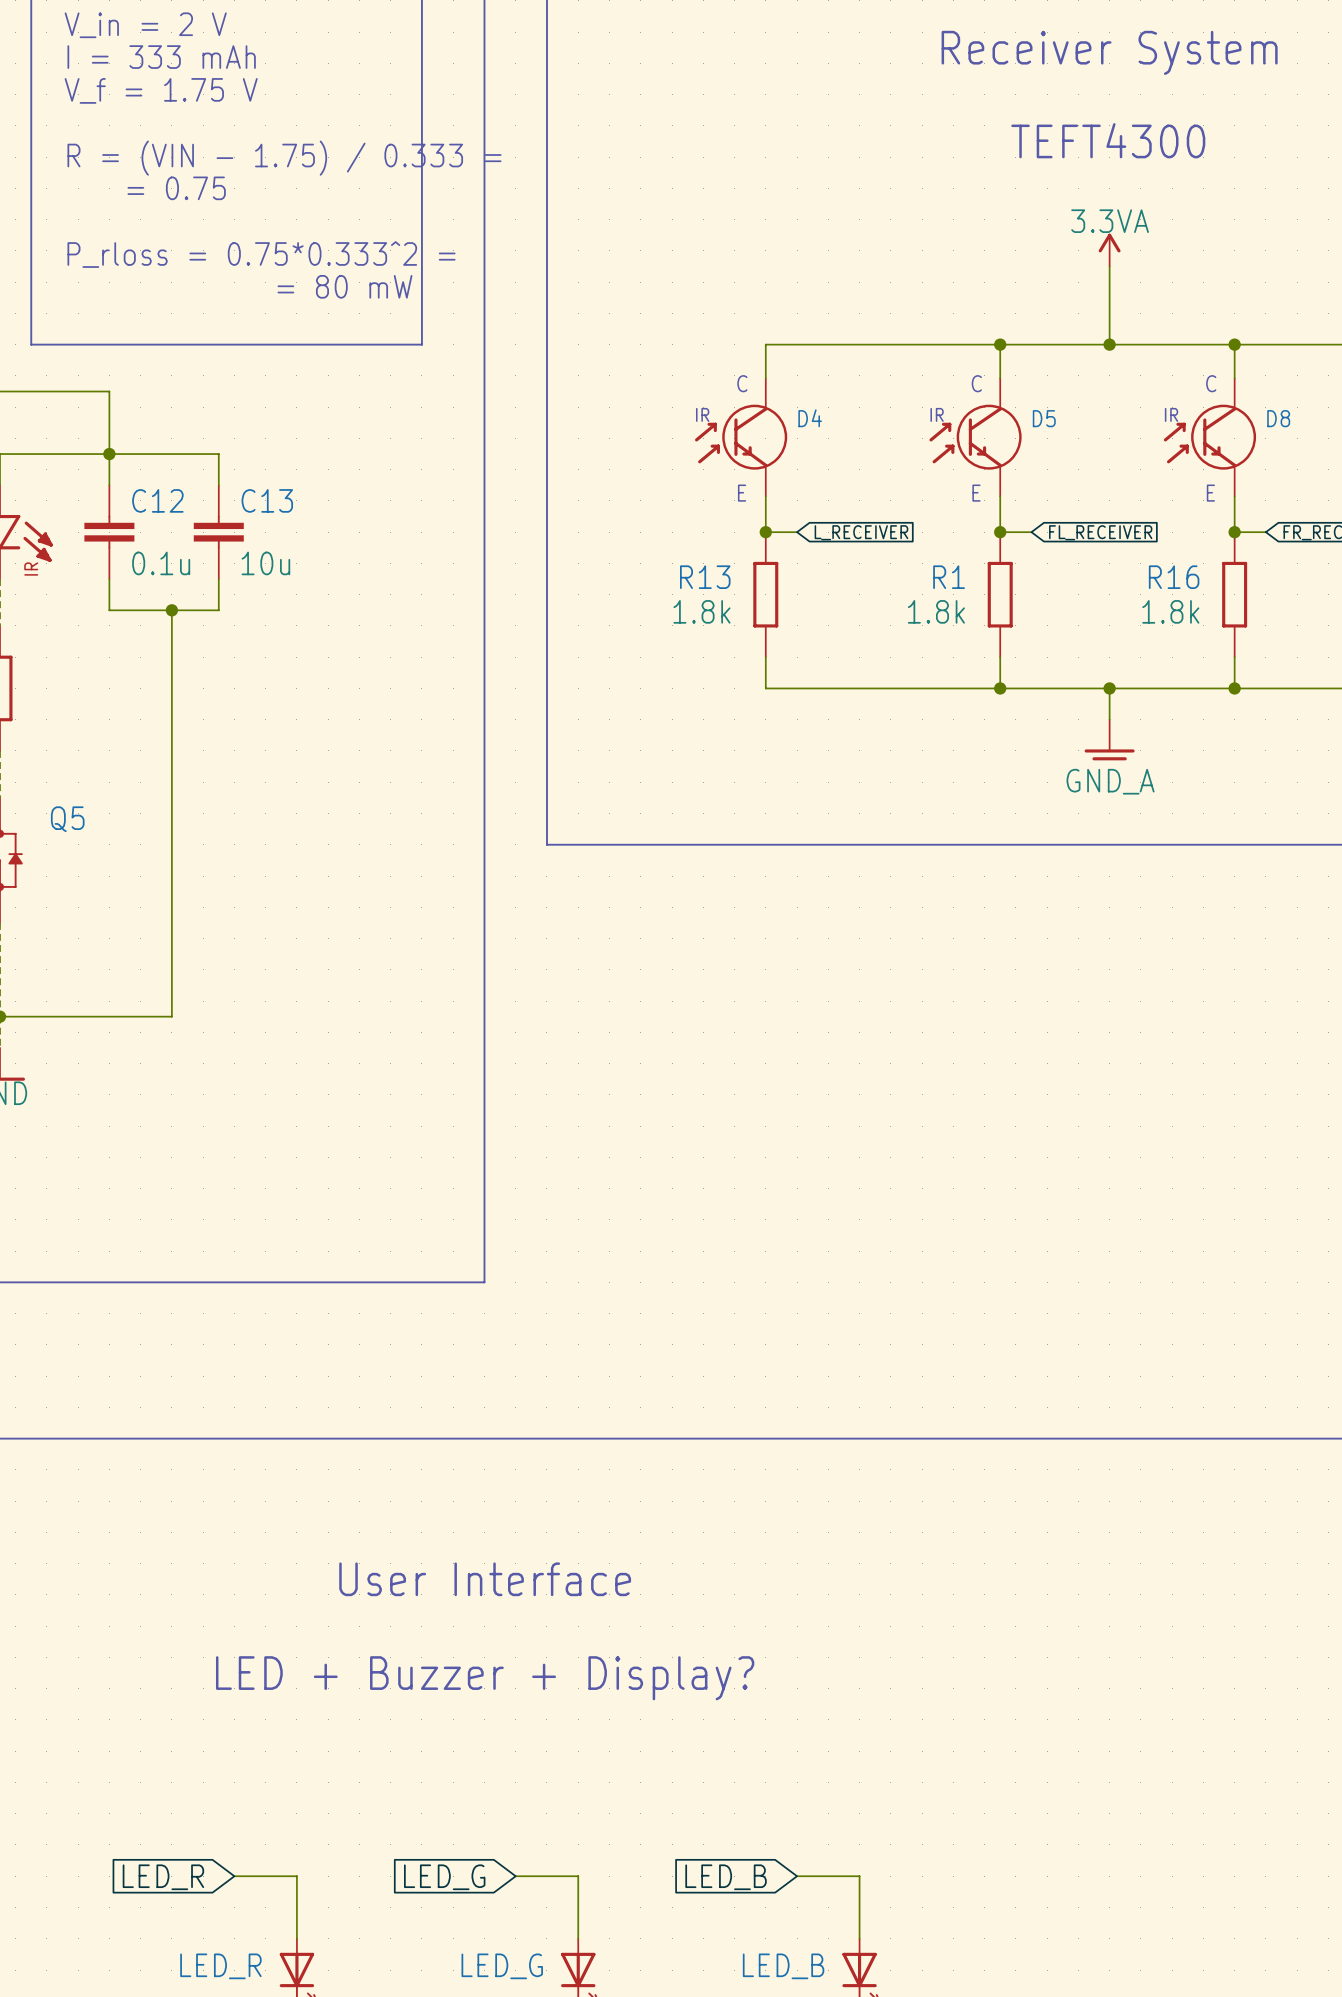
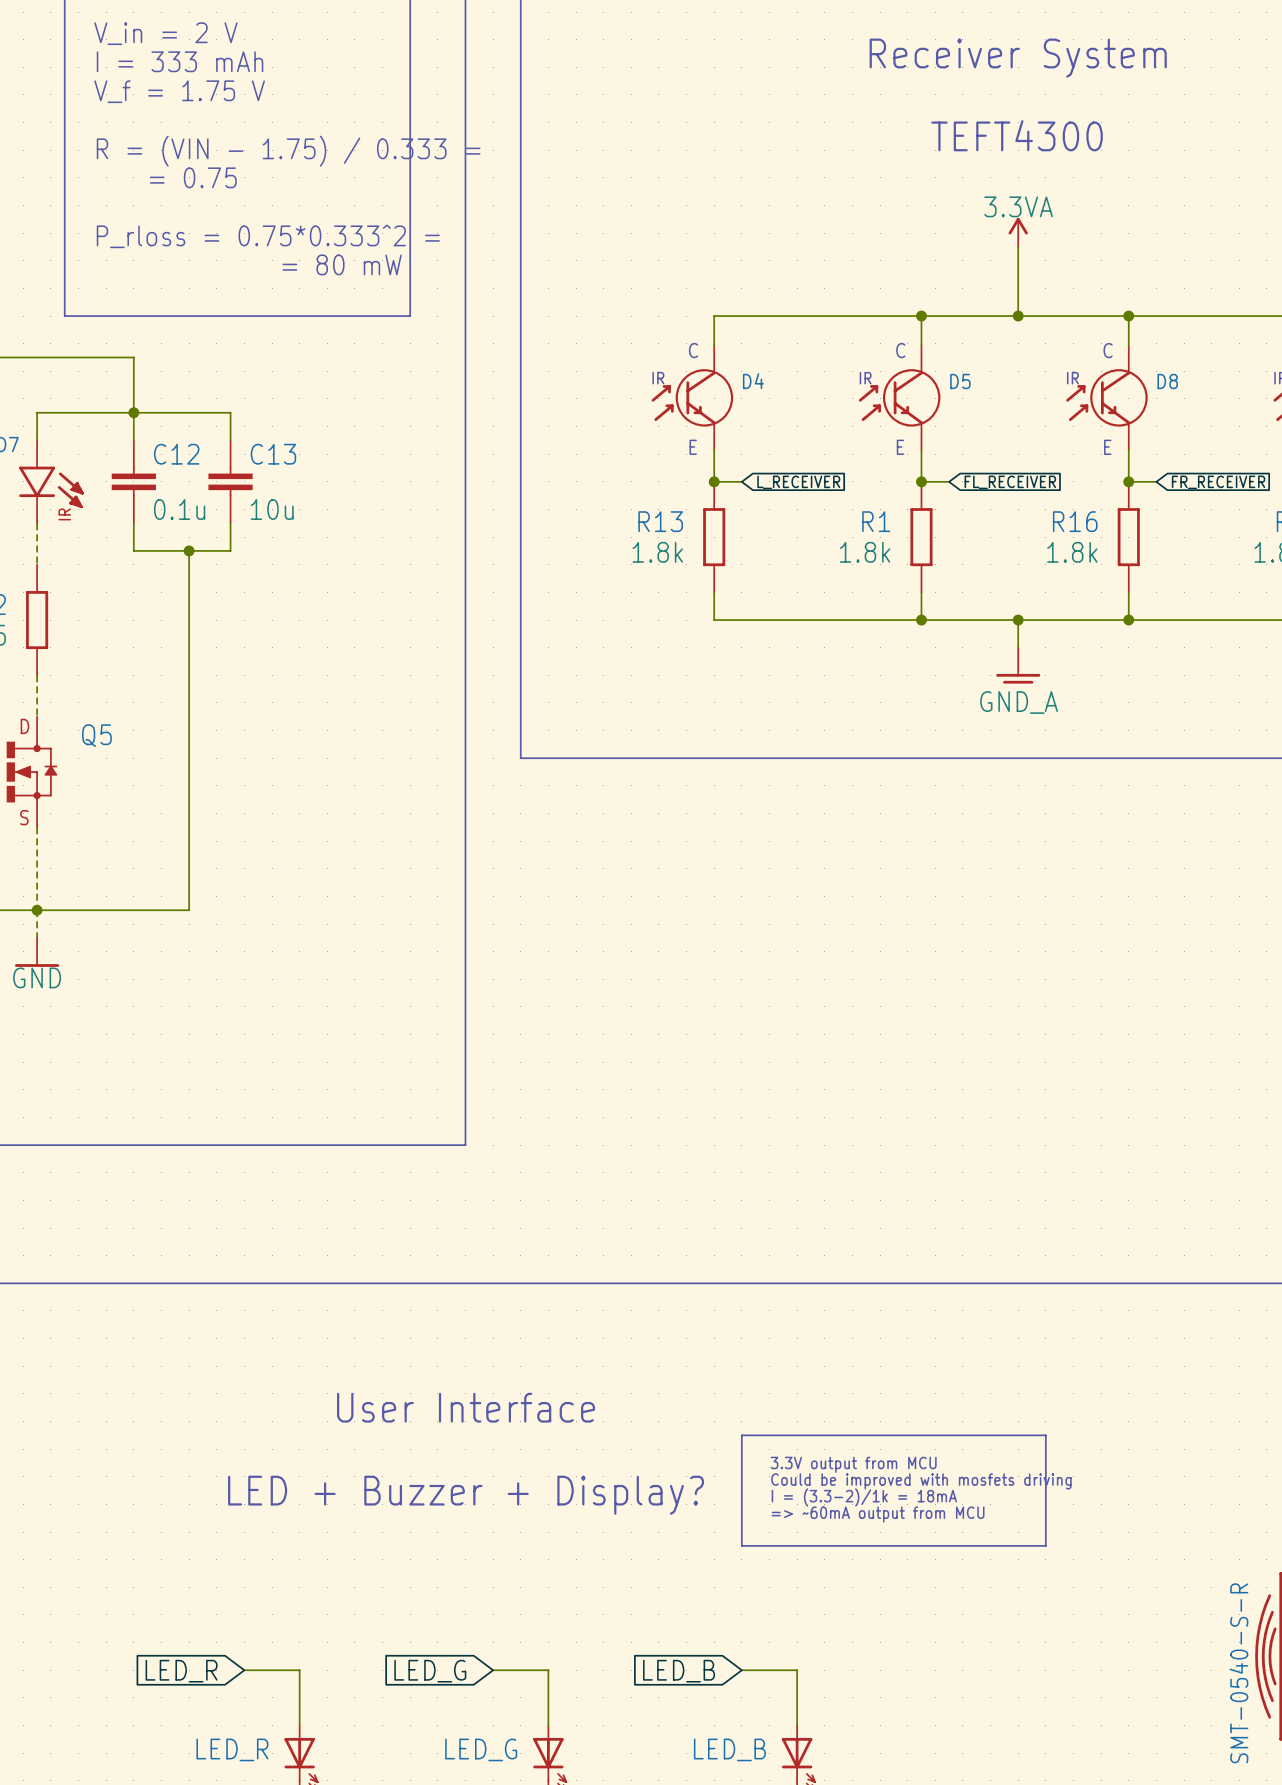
line: none -> (741, 1435) (741, 1545) (1045, 1545) (1045, 1435) (741, 1435)
text: none -> 3.3V output from MCU (853, 1464)
text: none -> Could be improved with mosfets driving (921, 1481)
text: none -> I = (3.3-2)/1k = 18mA (864, 1497)
text: none -> => ~60mA output from MCU (878, 1514)

